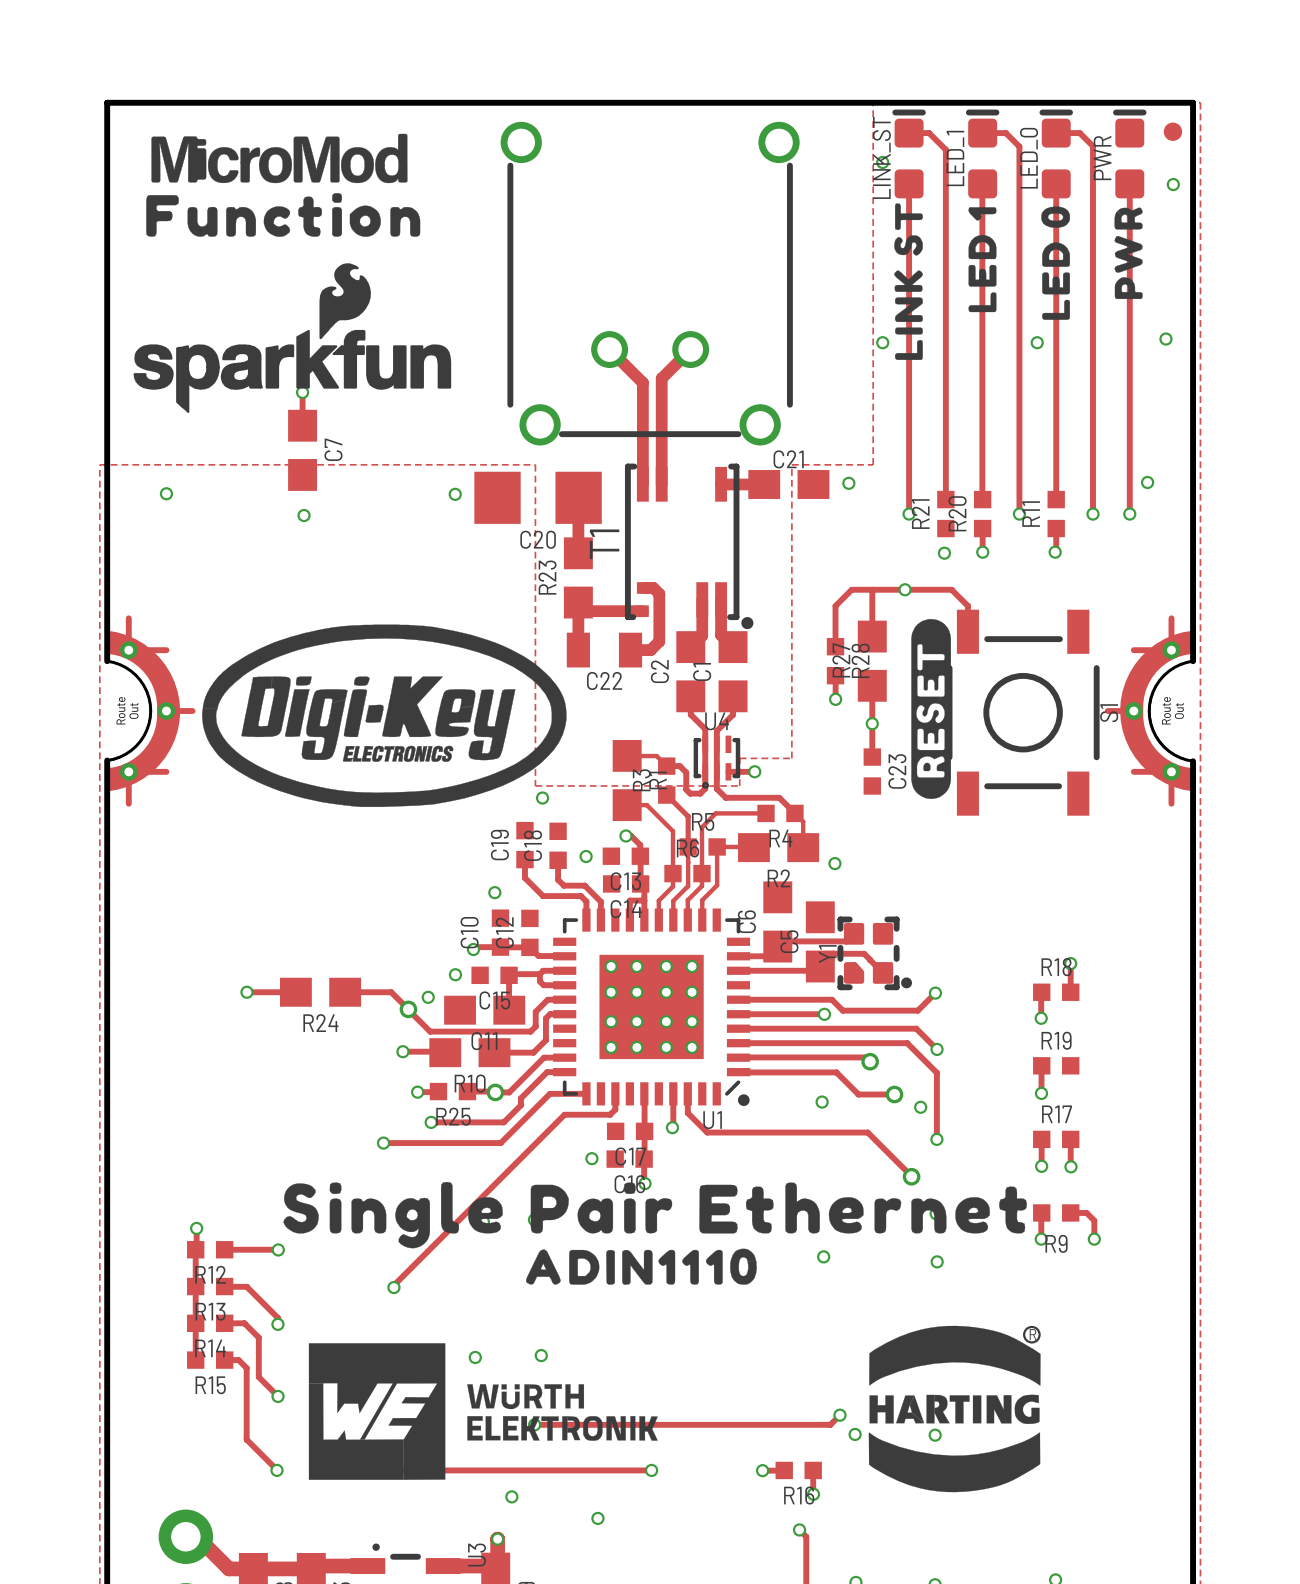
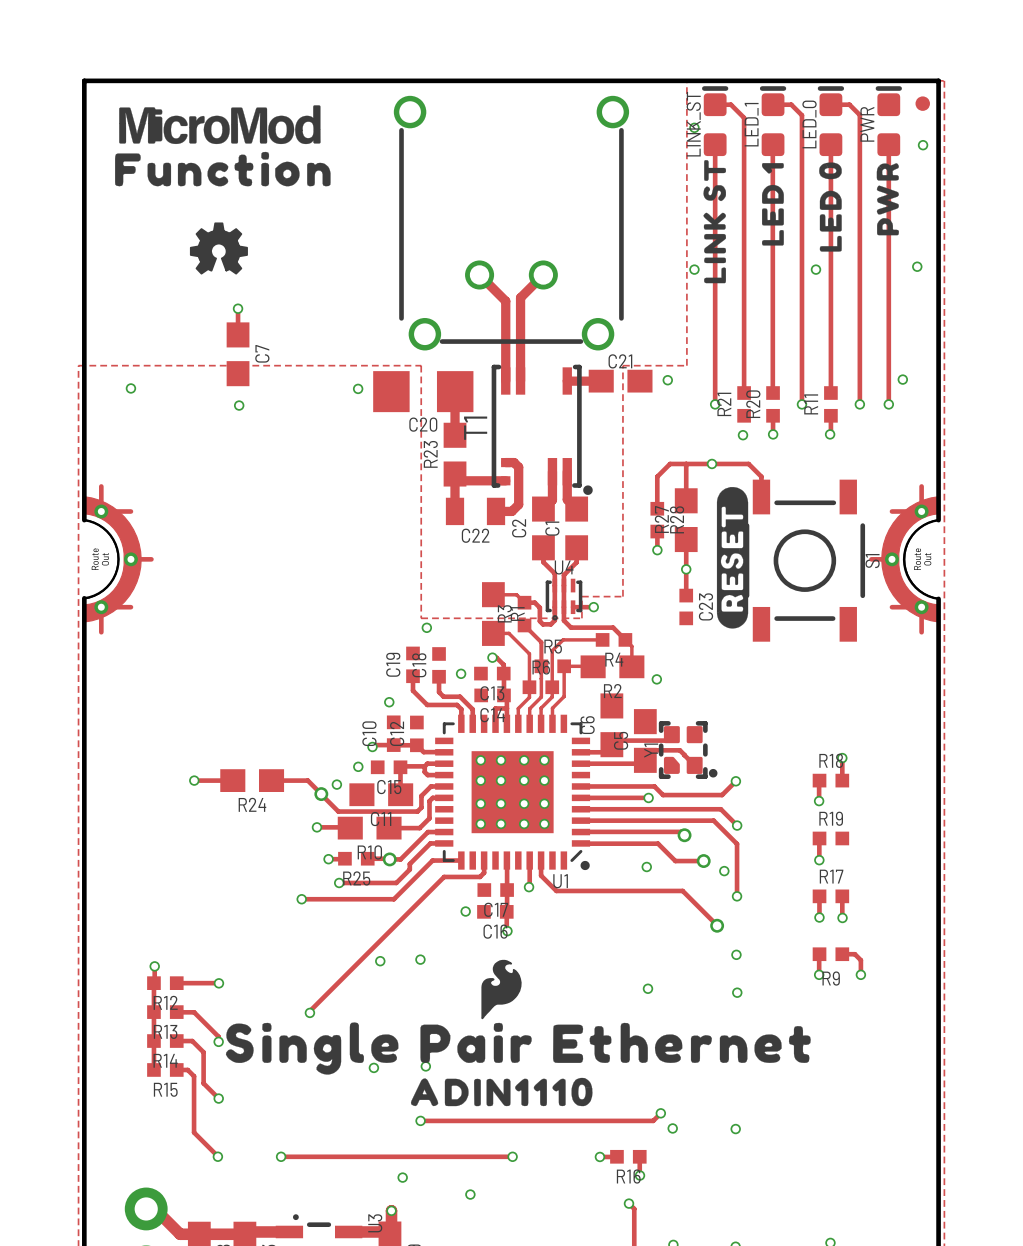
drawing shape: [133, 263, 452, 413] -> [189, 222, 248, 275]
drawing: [202, 624, 567, 808] -> none
drawing position: (655, 1215) -> (518, 1048)
drawing: none -> [481, 959, 522, 1020]
drawing position: (641, 1266) -> (501, 1092)
drawing: [868, 1325, 1041, 1493] -> none
drawing: [308, 1343, 658, 1480] -> none

